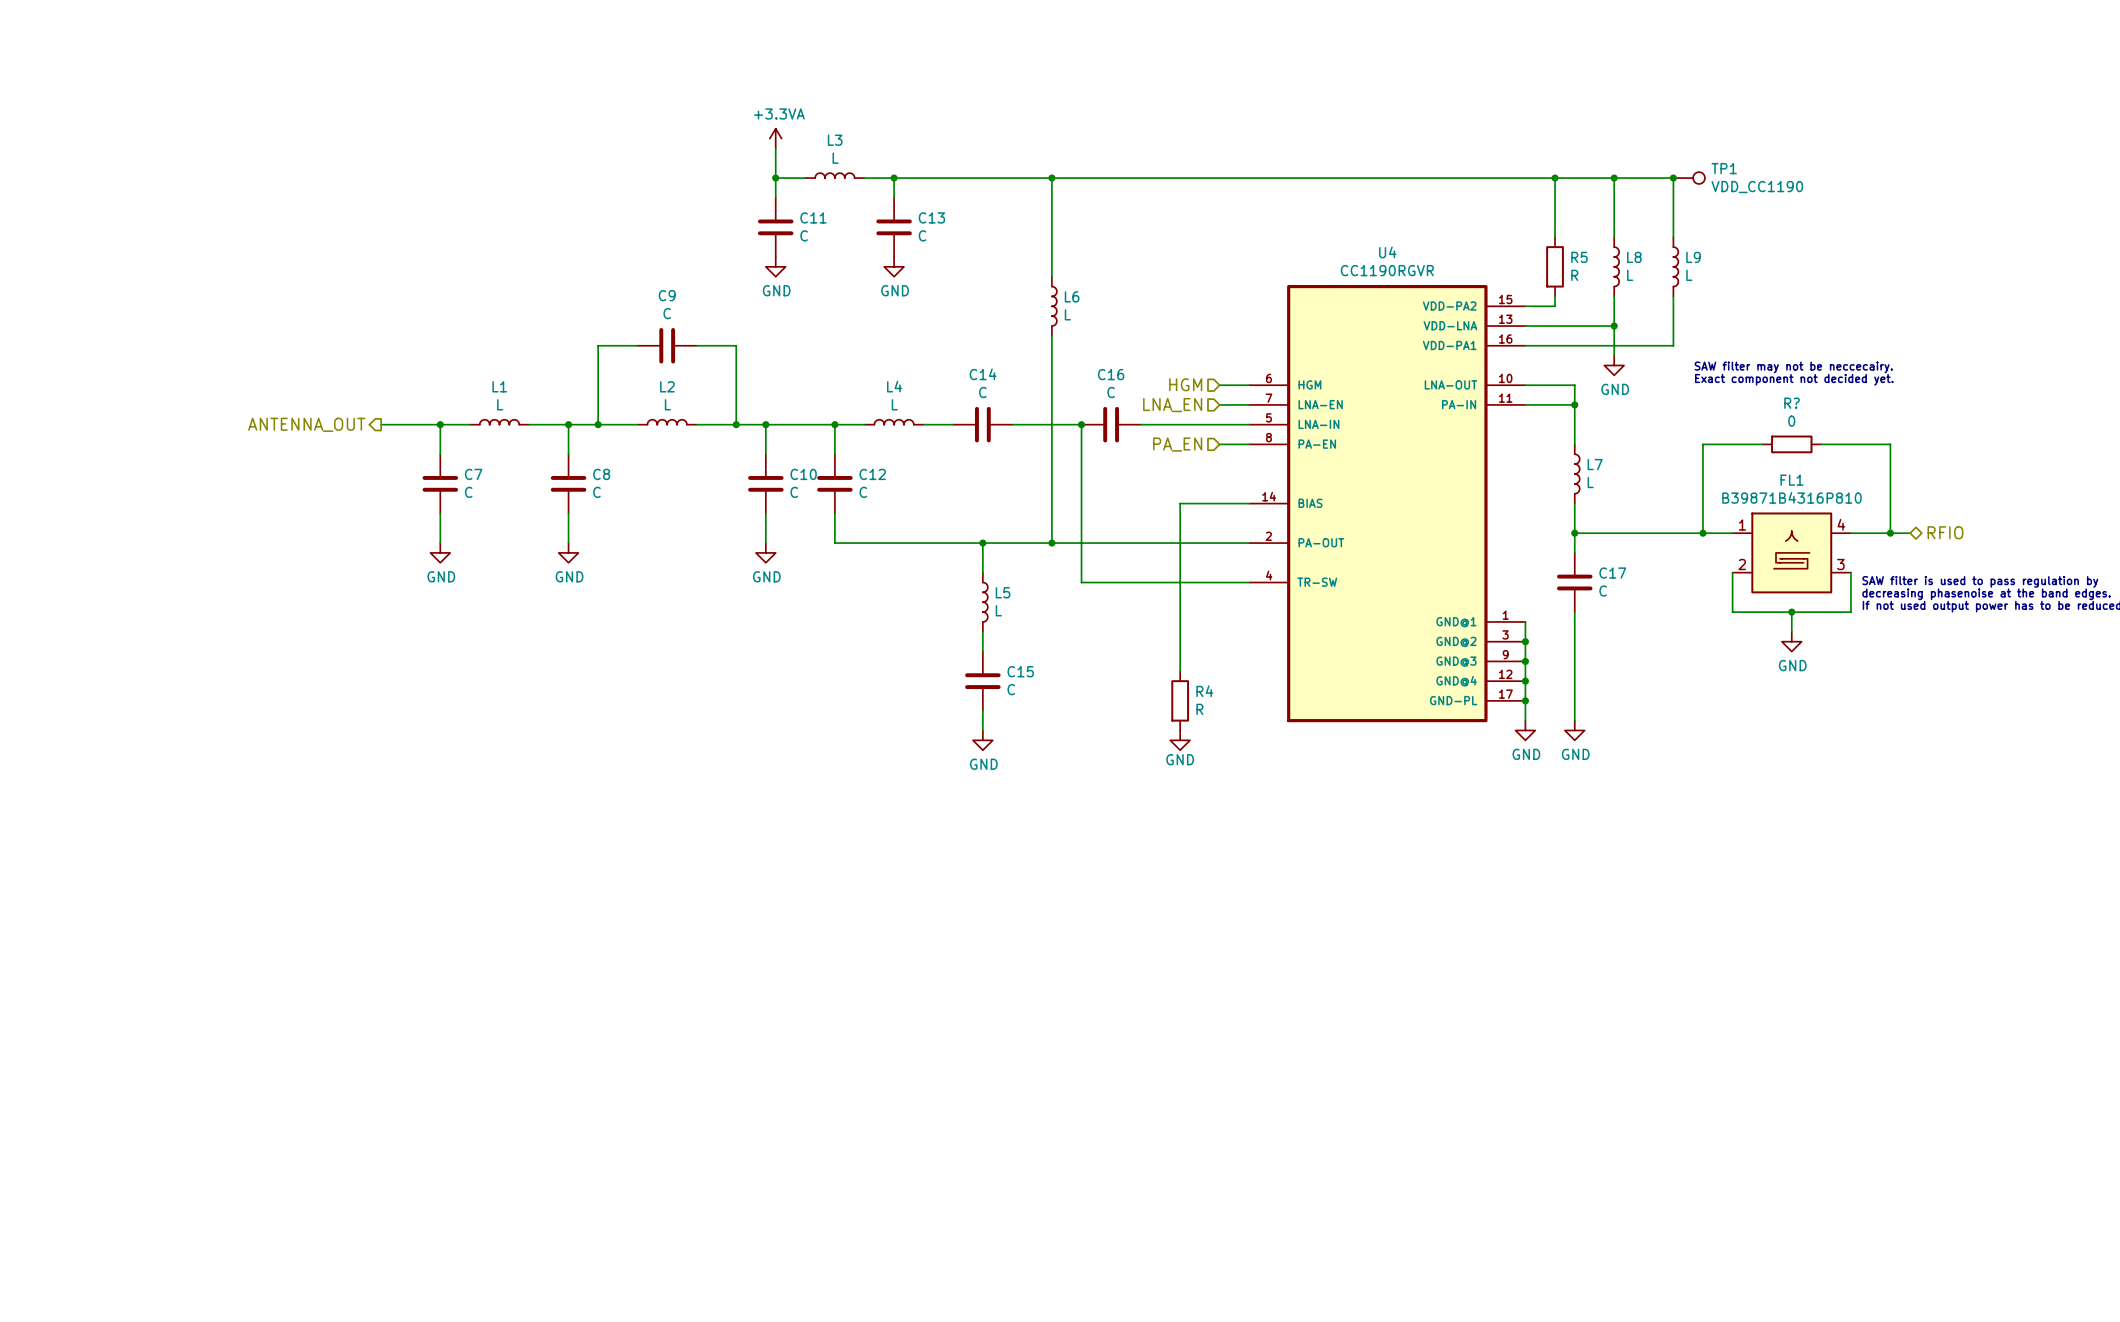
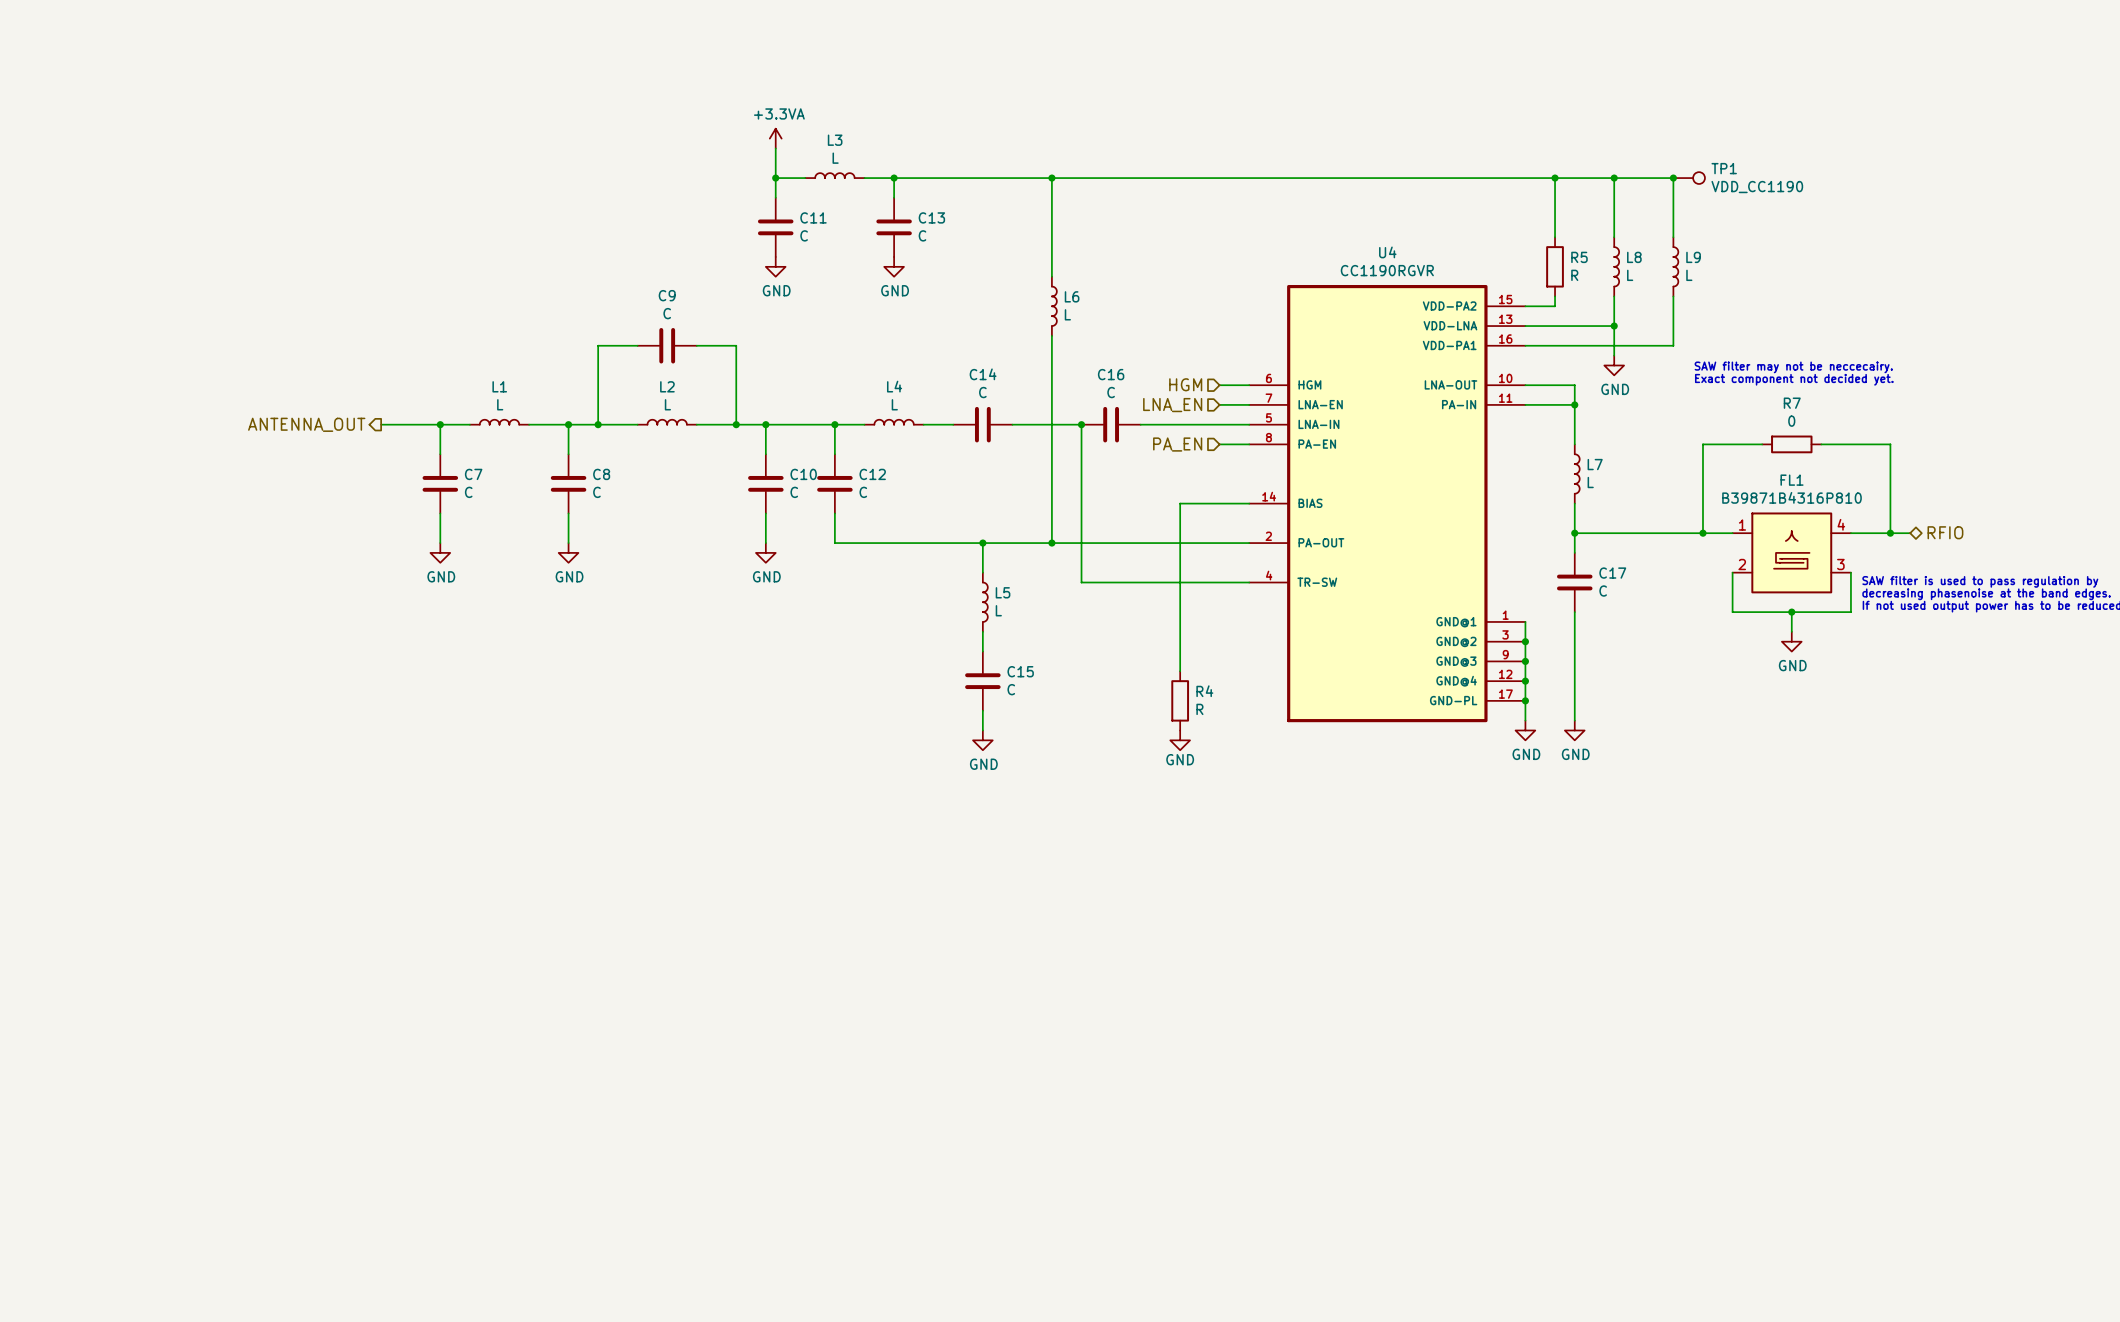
R? name: R? (1792, 403) -> R7 (1792, 403)

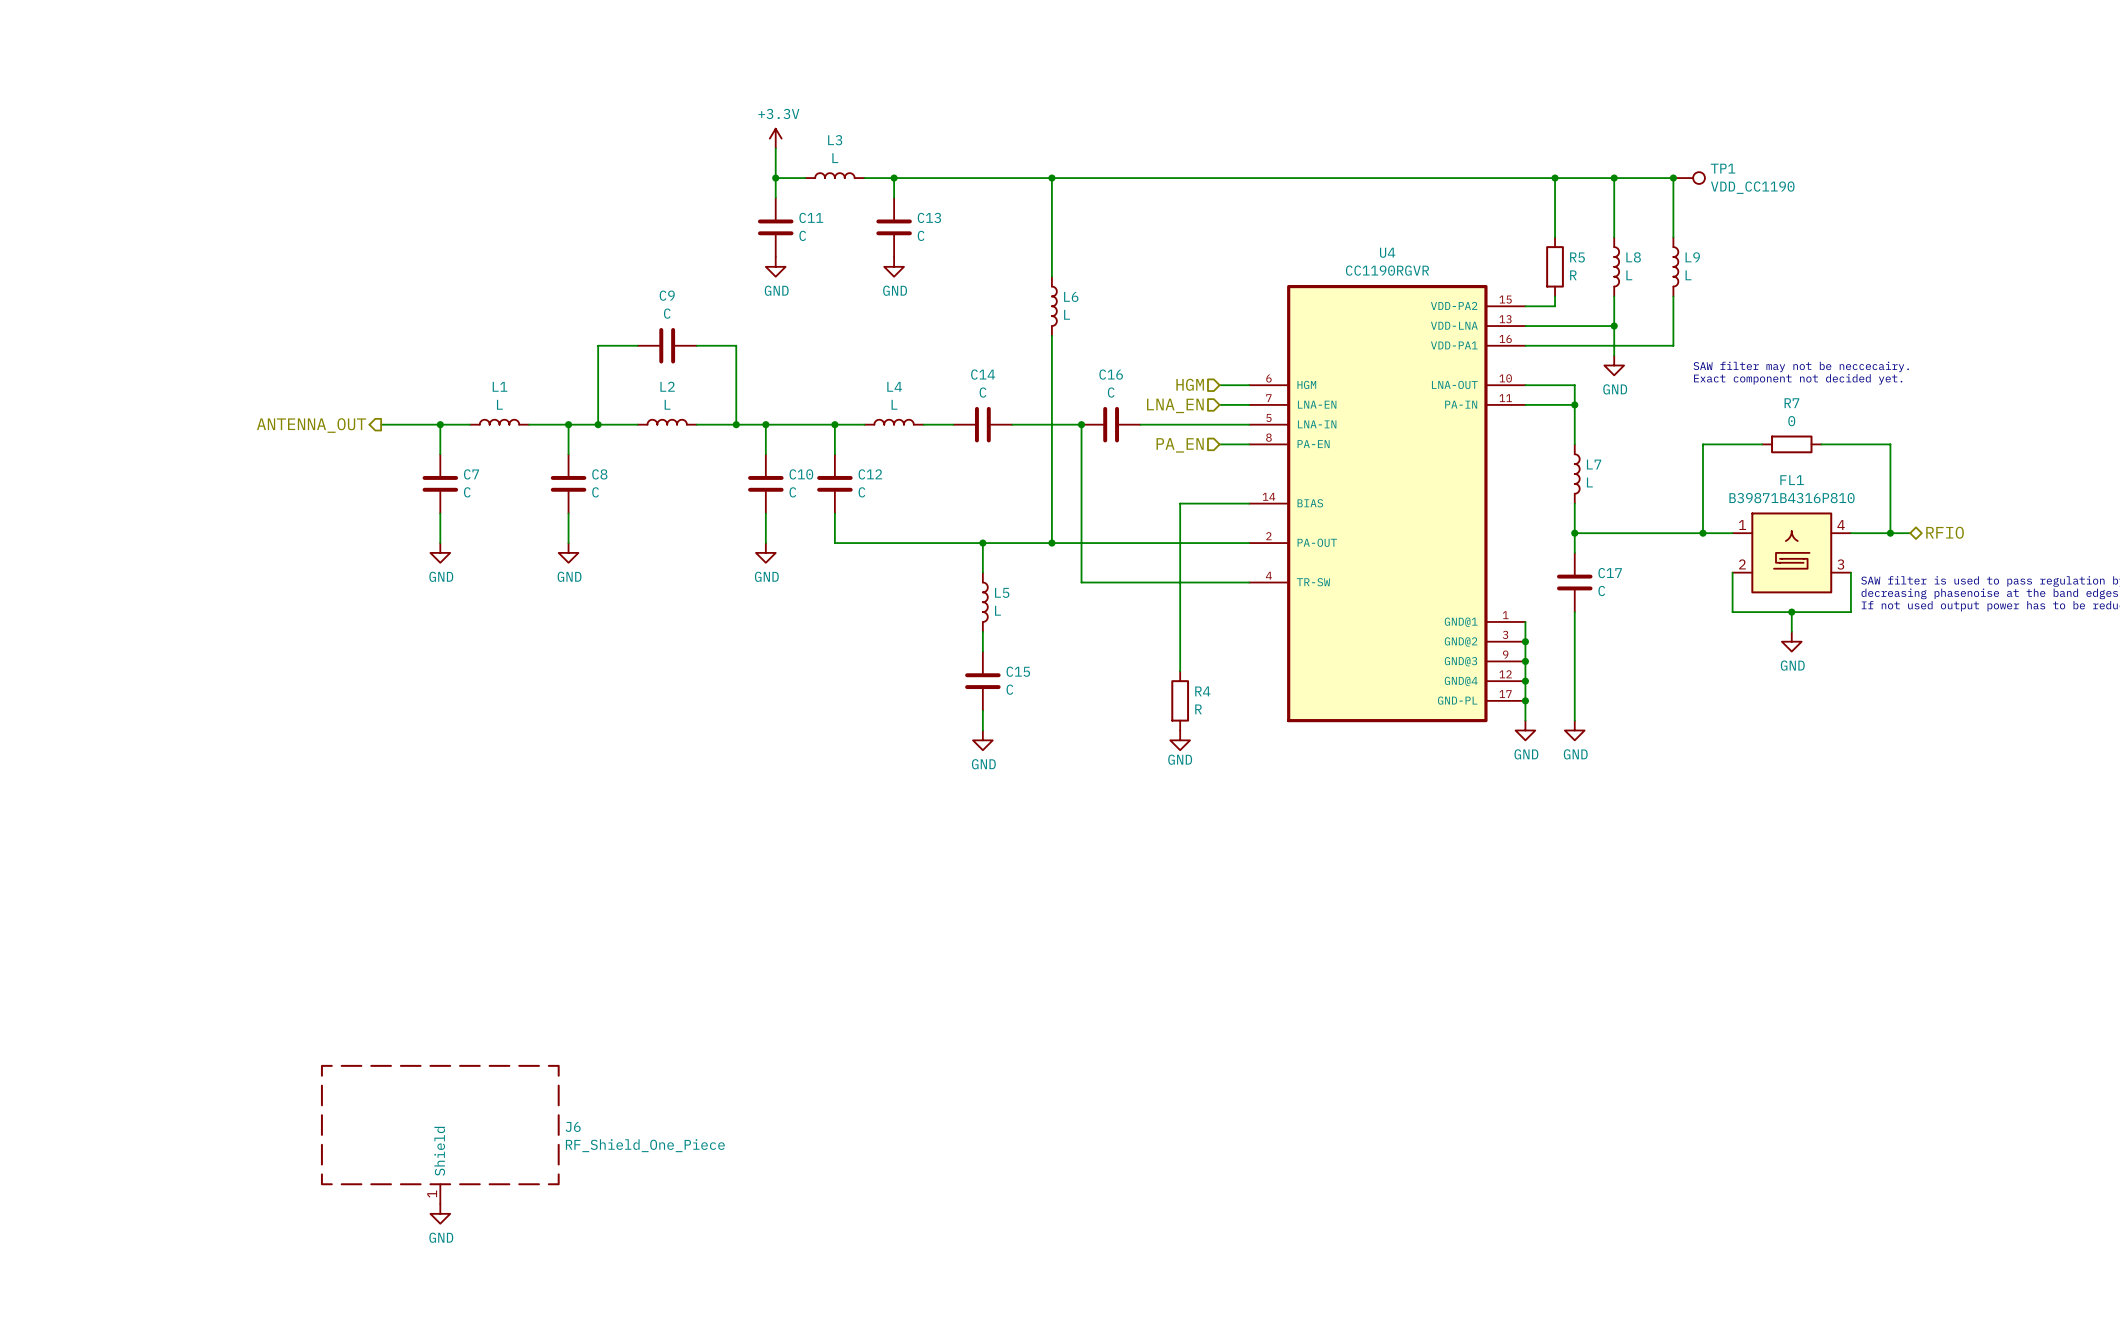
power symbol: +3.3VA (775, 138) -> +3.3V (775, 138)
J6: none -> RF_Shield_One_Piece (440, 1134)
power symbol: none -> GND (440, 1213)

